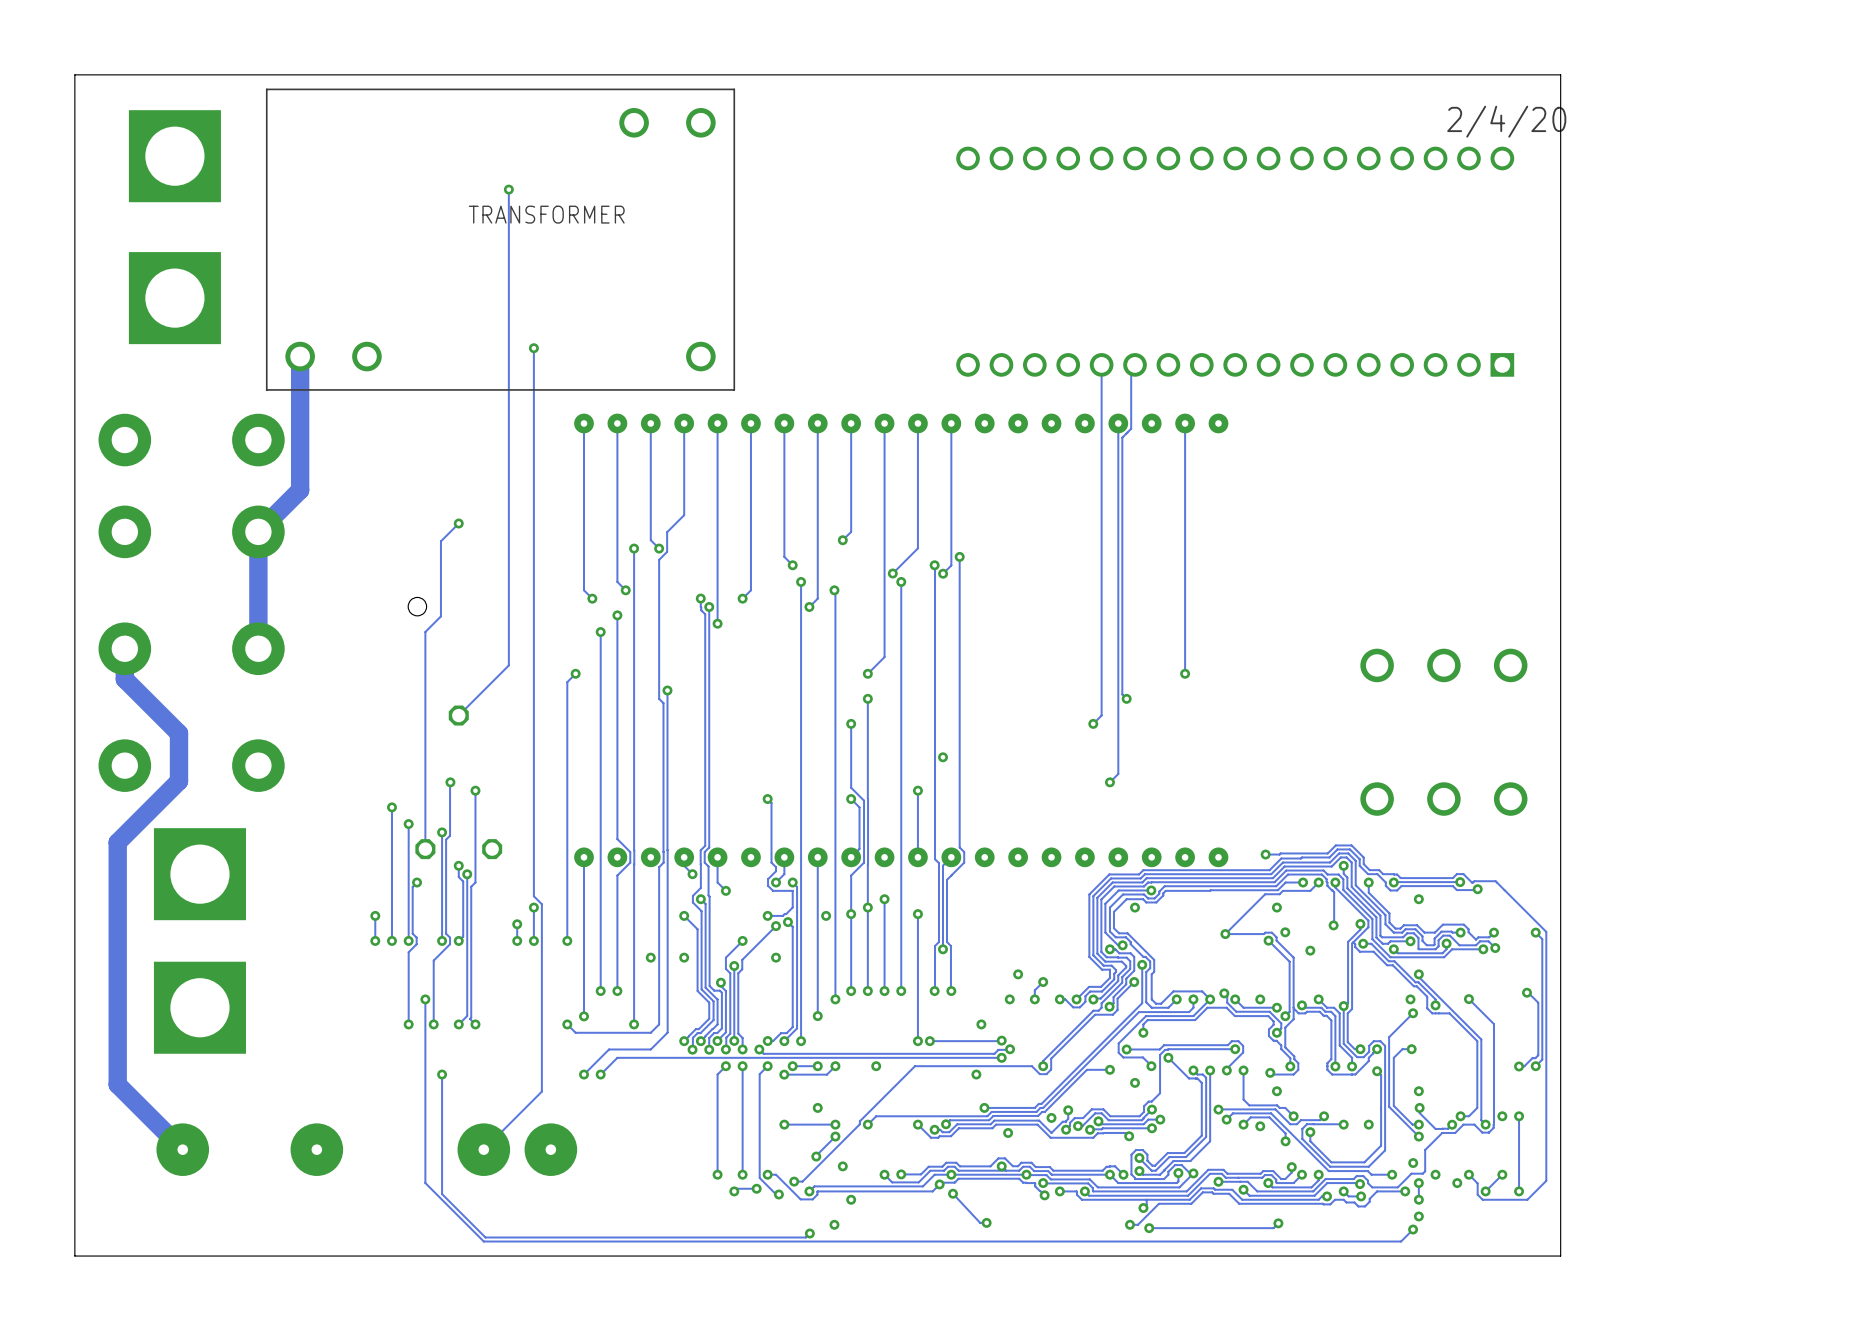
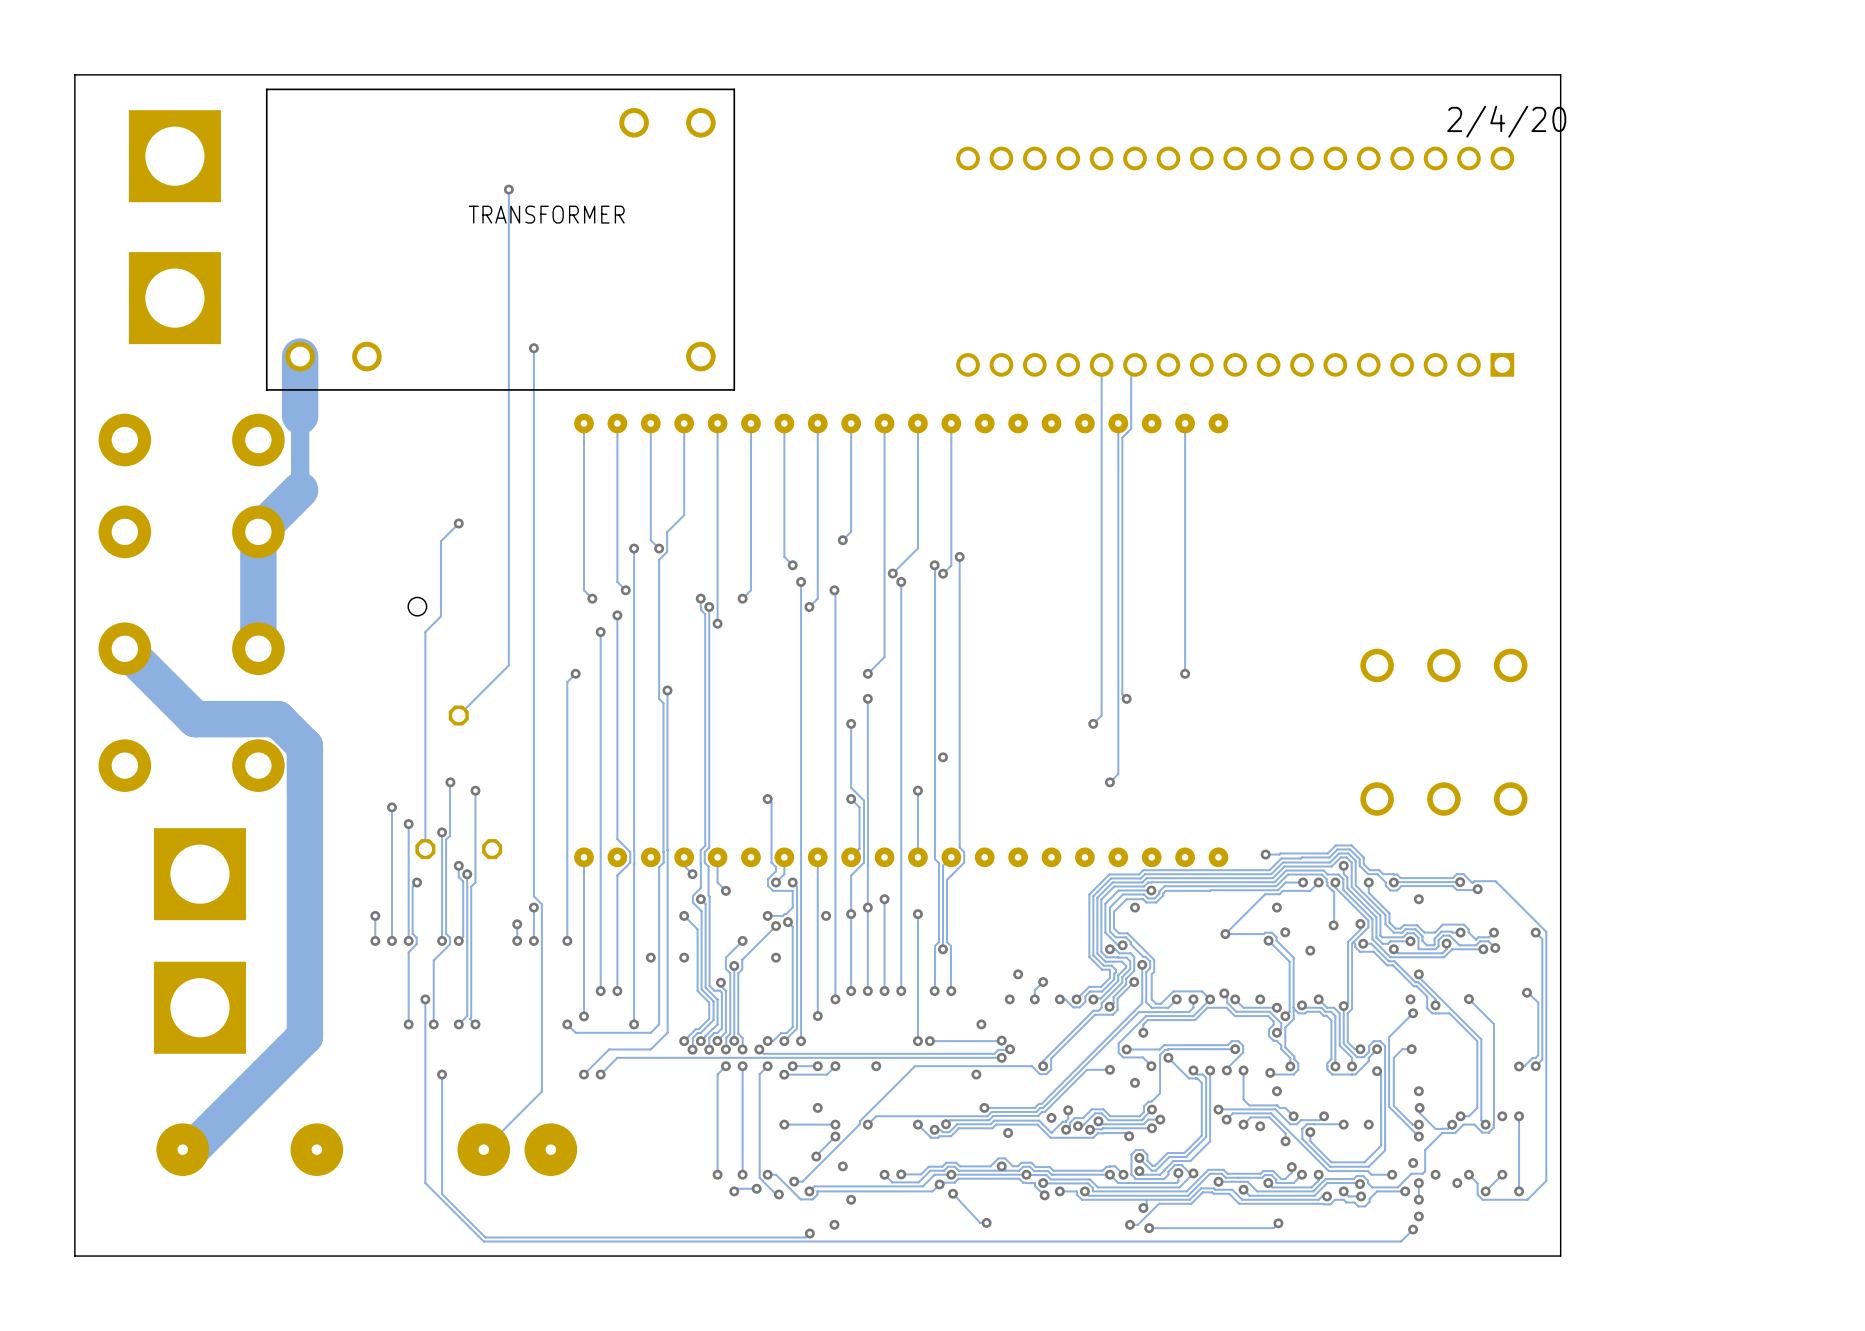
track width: thin (300, 356) (300, 416) -> thick (300, 356) (300, 416)
track width: thin (300, 490) (258, 531) (258, 648) -> thick (300, 490) (258, 531) (258, 648)
track: (124, 648) (124, 679) (179, 733) (179, 781) (117, 842) (117, 1084) (182, 1149) -> (124, 648) (195, 719) (277, 719) (304, 746) (304, 1036) (191, 1149) (182, 1149)

